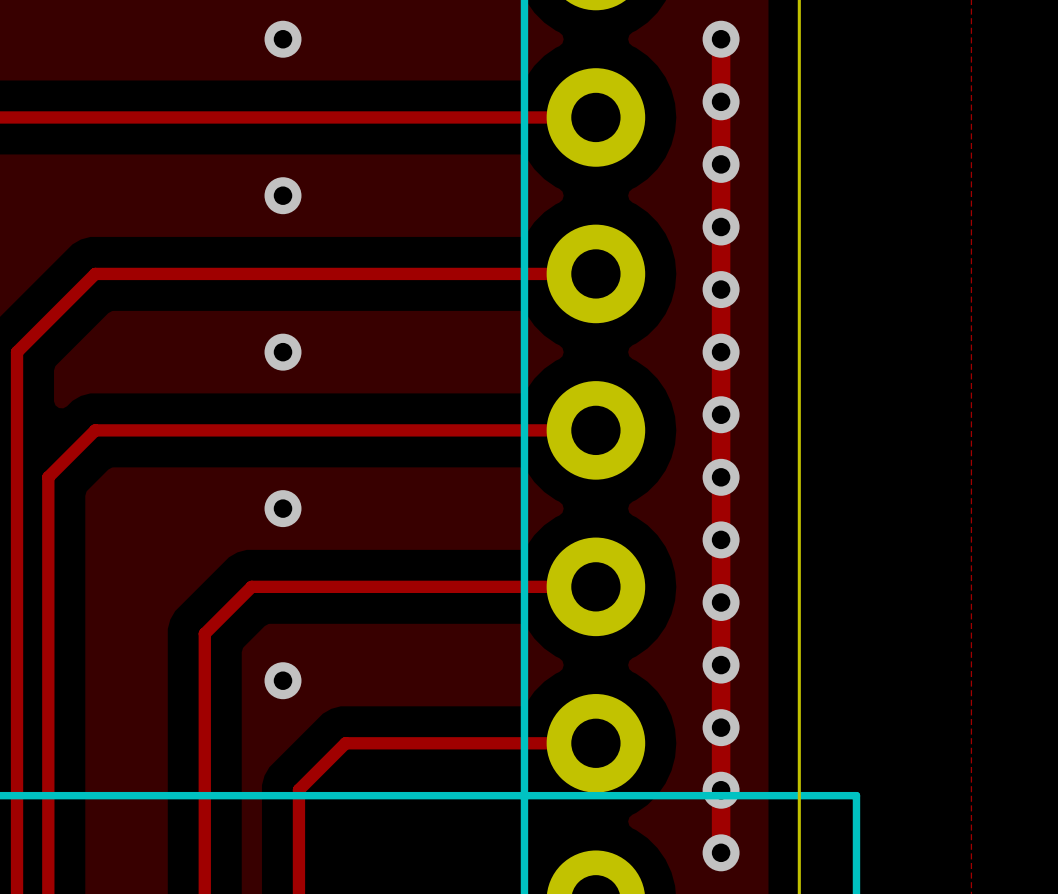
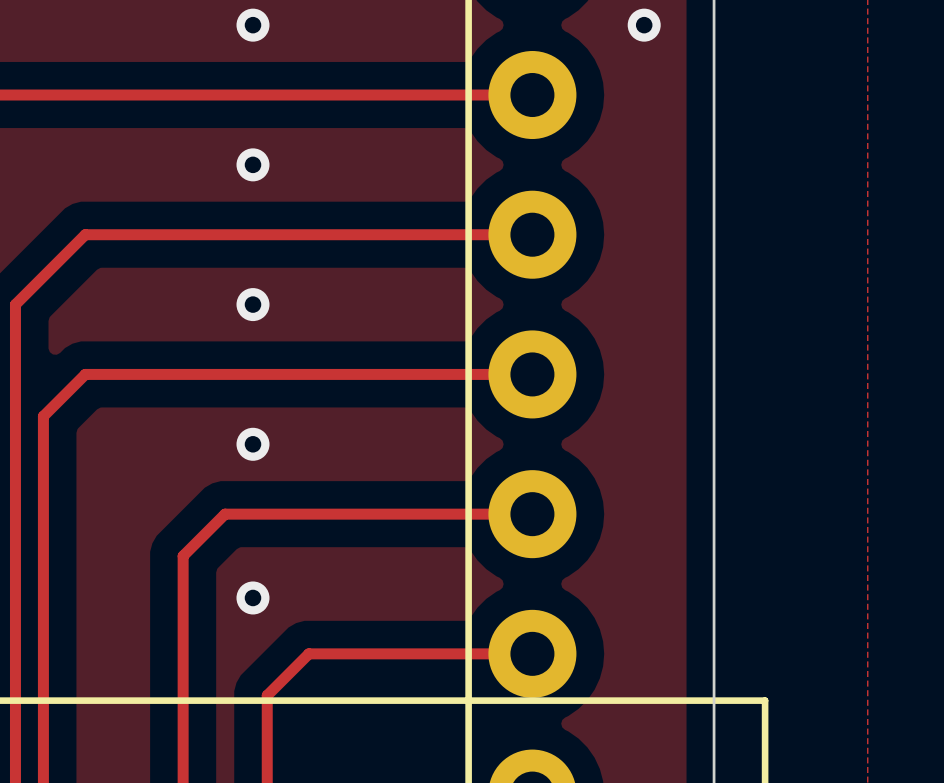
track: (721, 39) (721, 852) -> none
via: (721, 101) -> none
via: (721, 164) -> none
via: (721, 226) -> none
via: (721, 289) -> none
via: (721, 352) -> none
via: (721, 414) -> none
via: (721, 477) -> none
via: (721, 539) -> none
via: (721, 602) -> none
via: (721, 665) -> none
via: (721, 727) -> none
via: (721, 790) -> none
via: (721, 852) -> none

